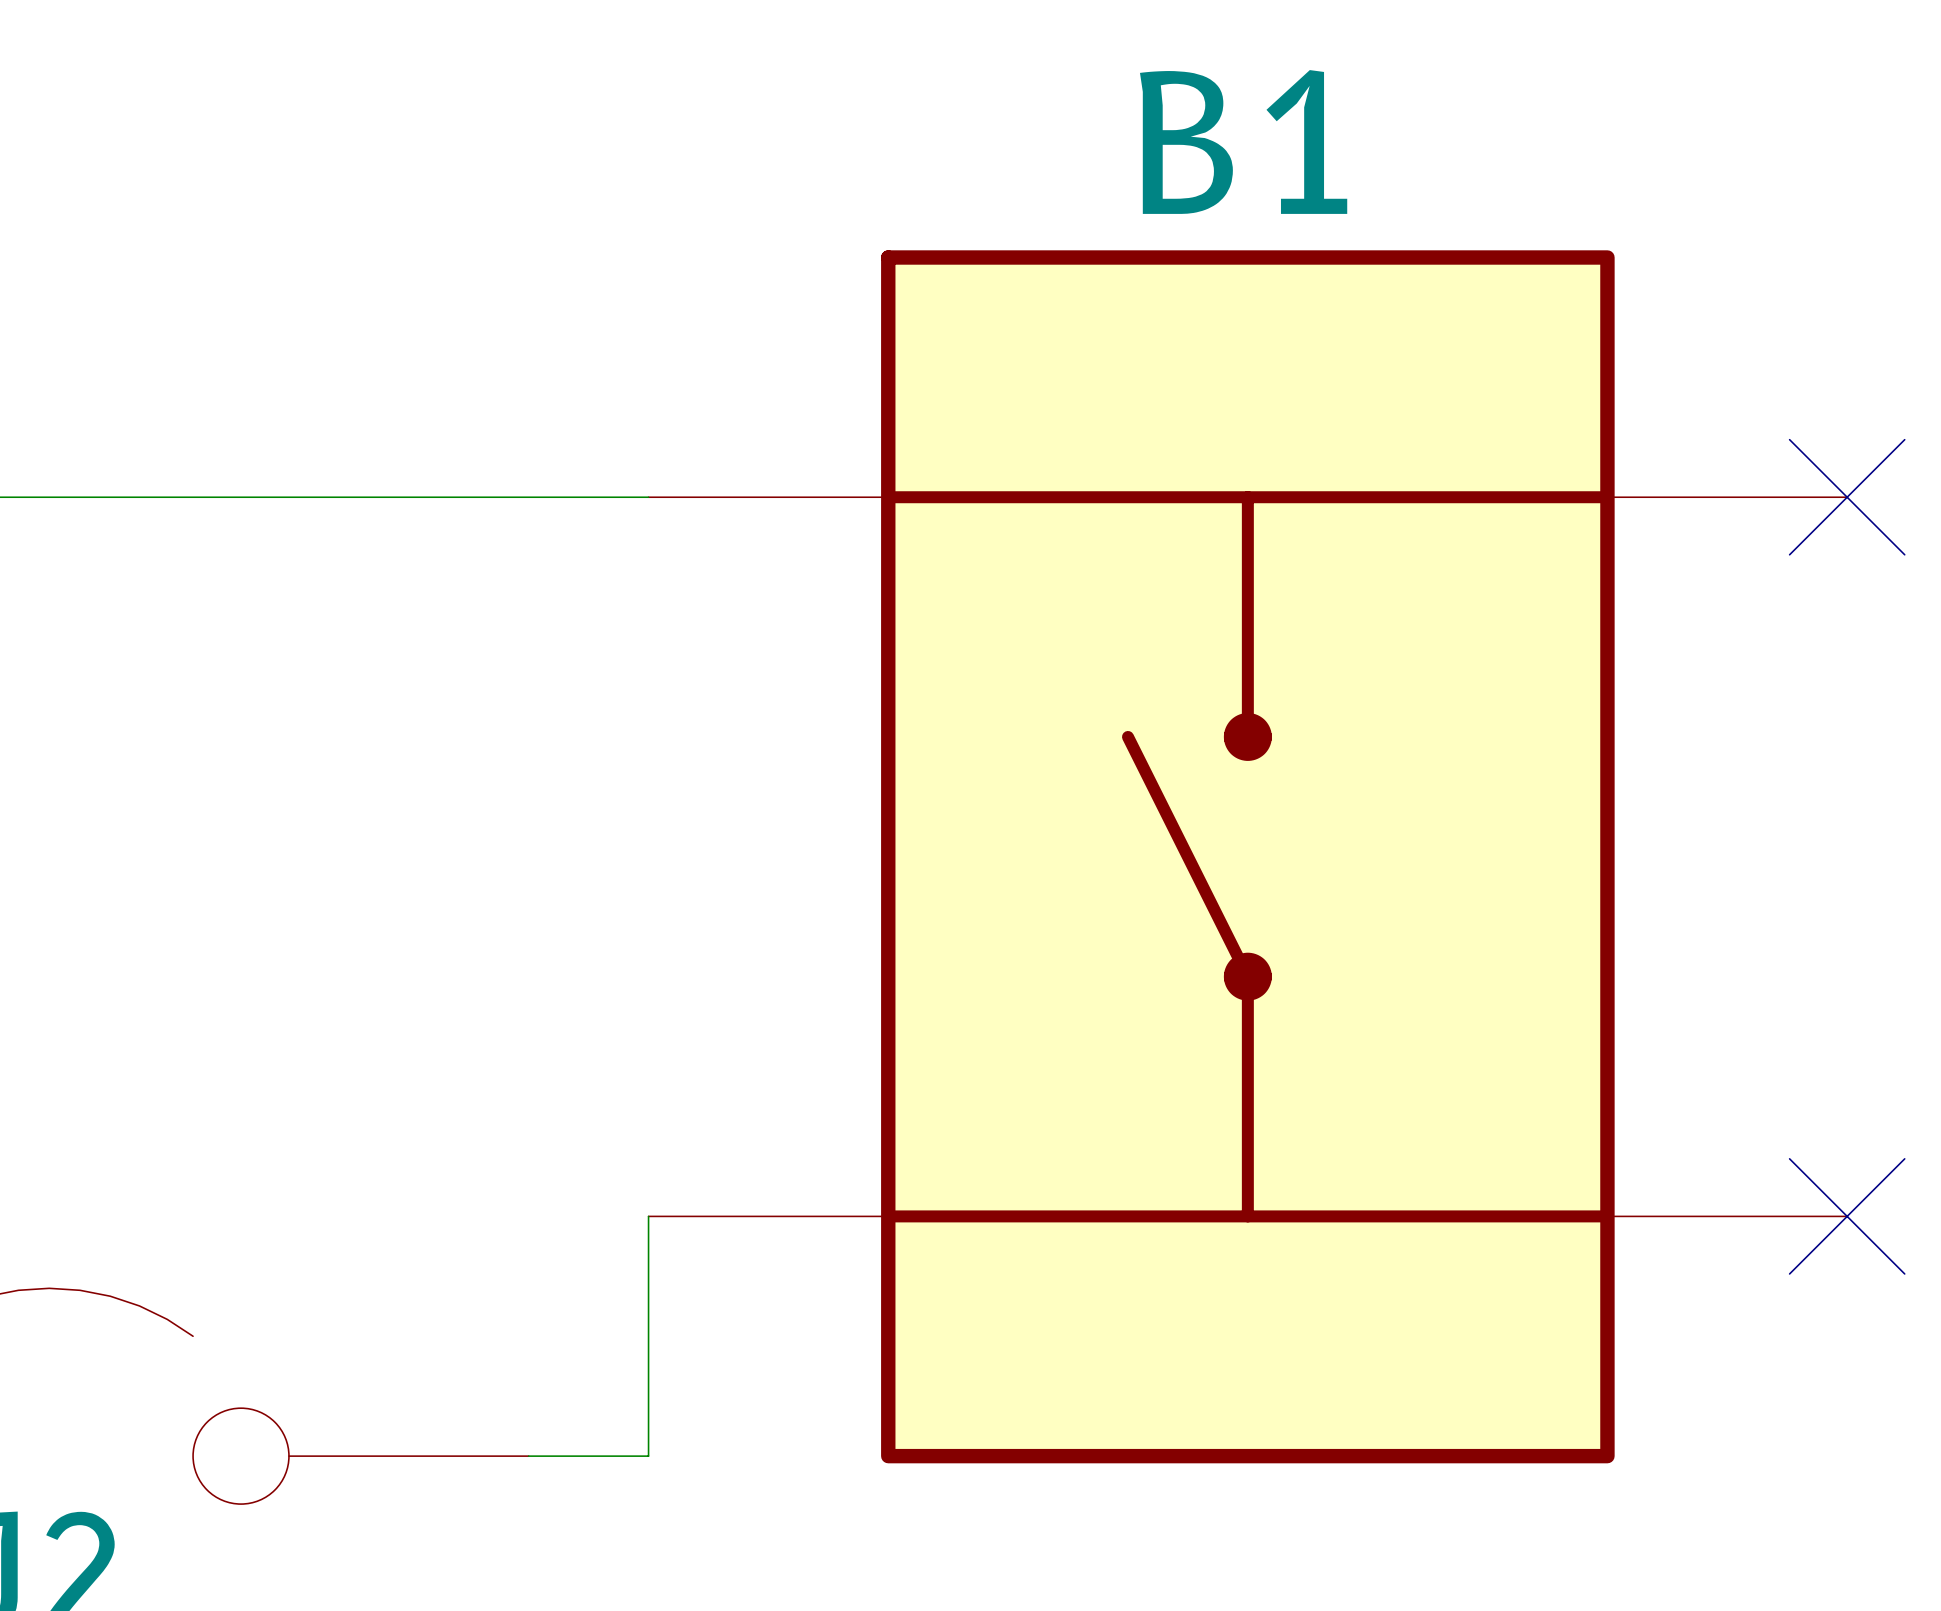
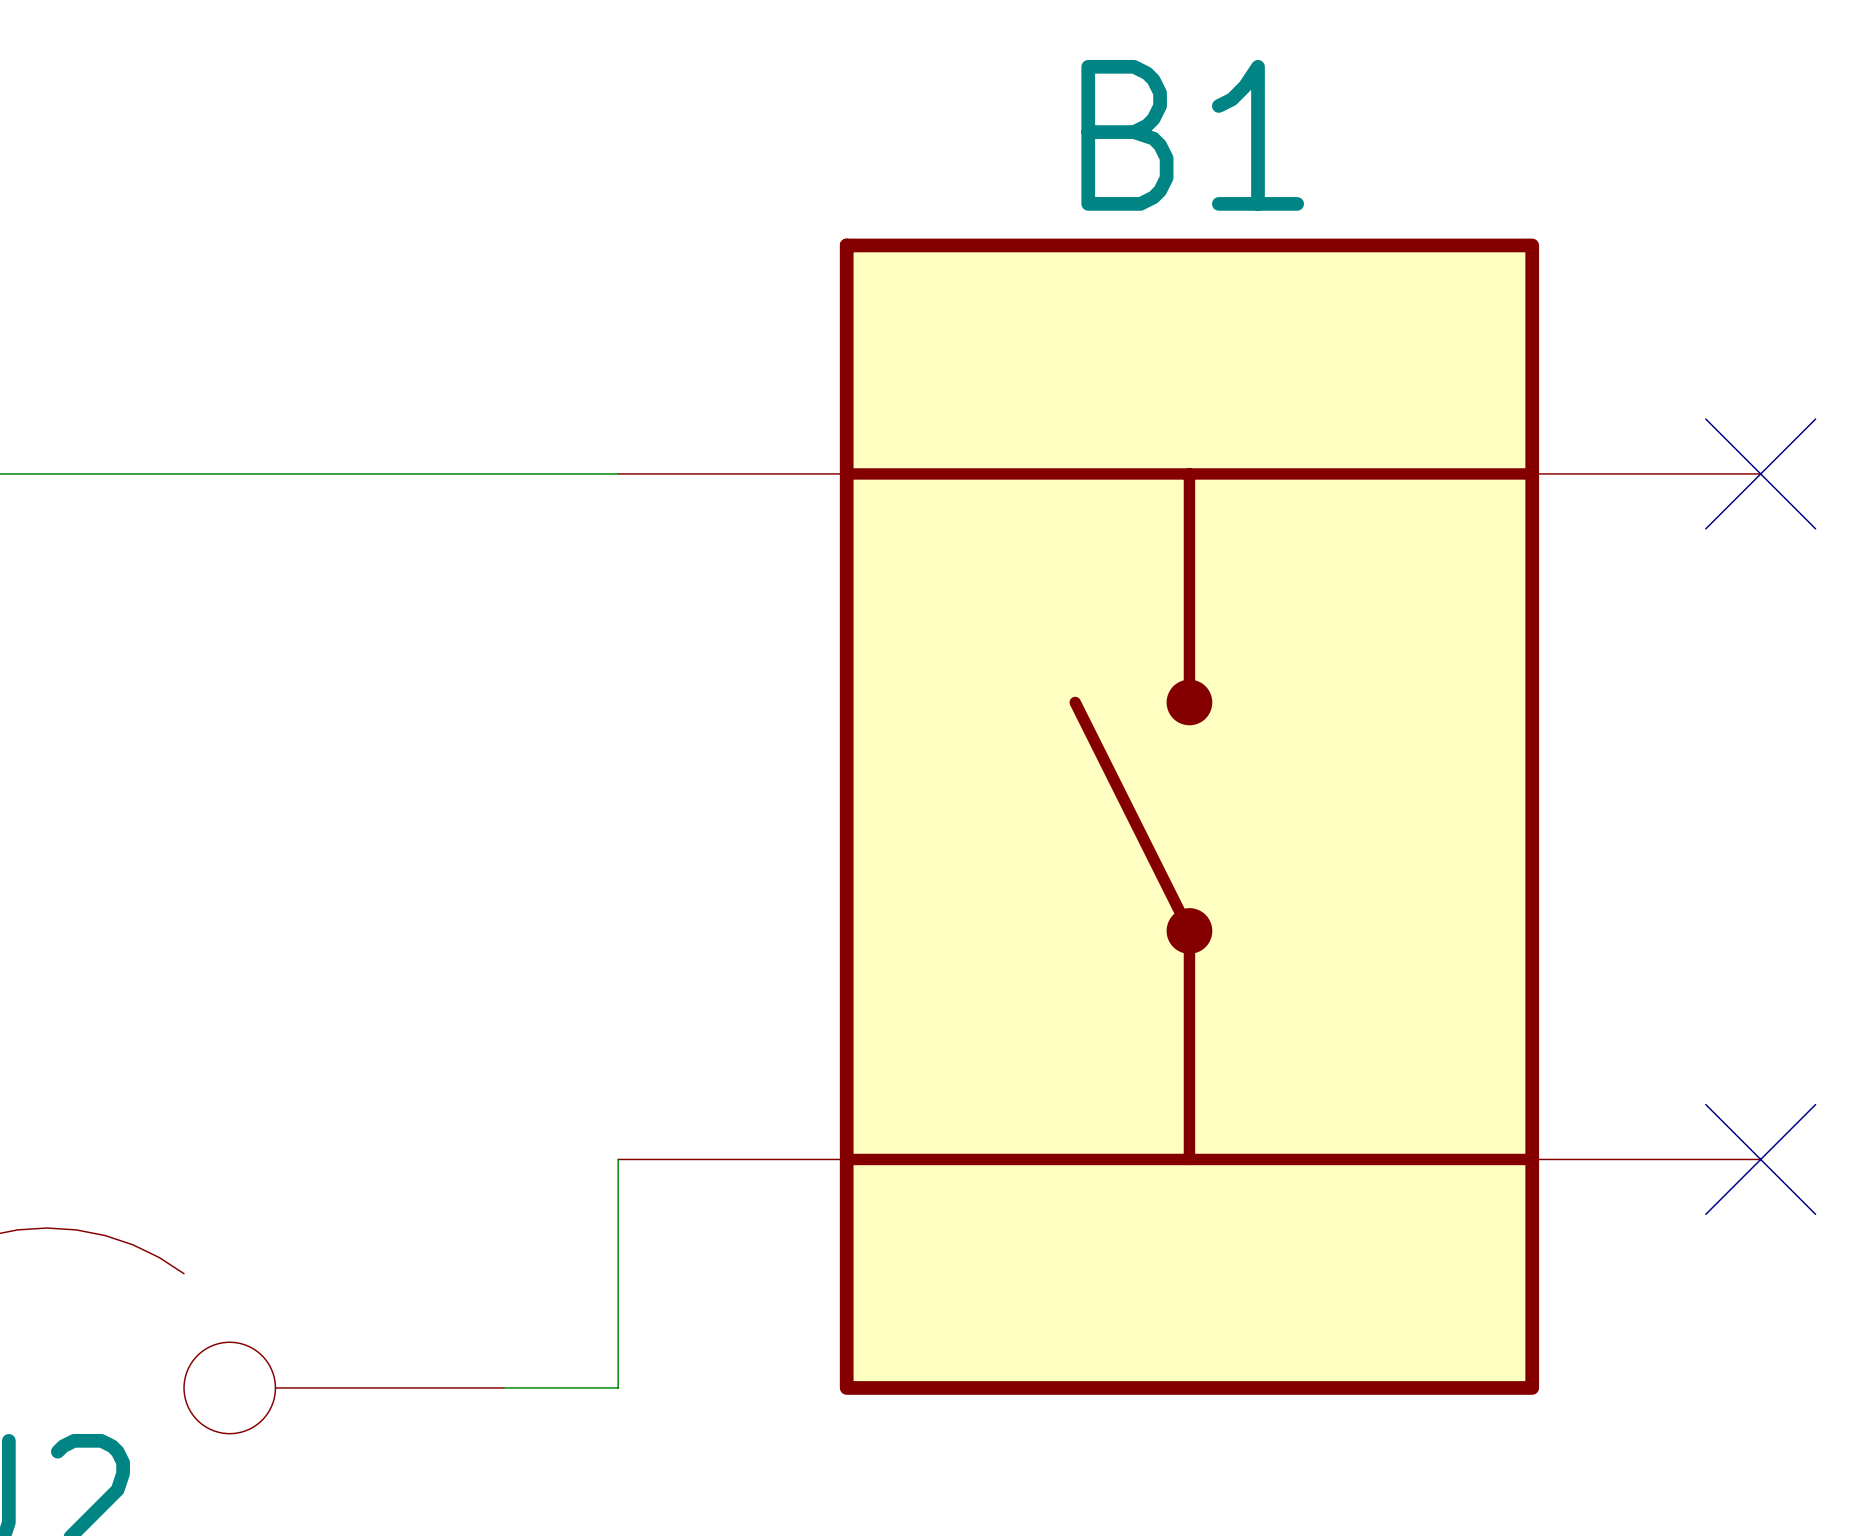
B1 symbol: [648, 250, 1848, 1464] -> [618, 238, 1761, 1395]

